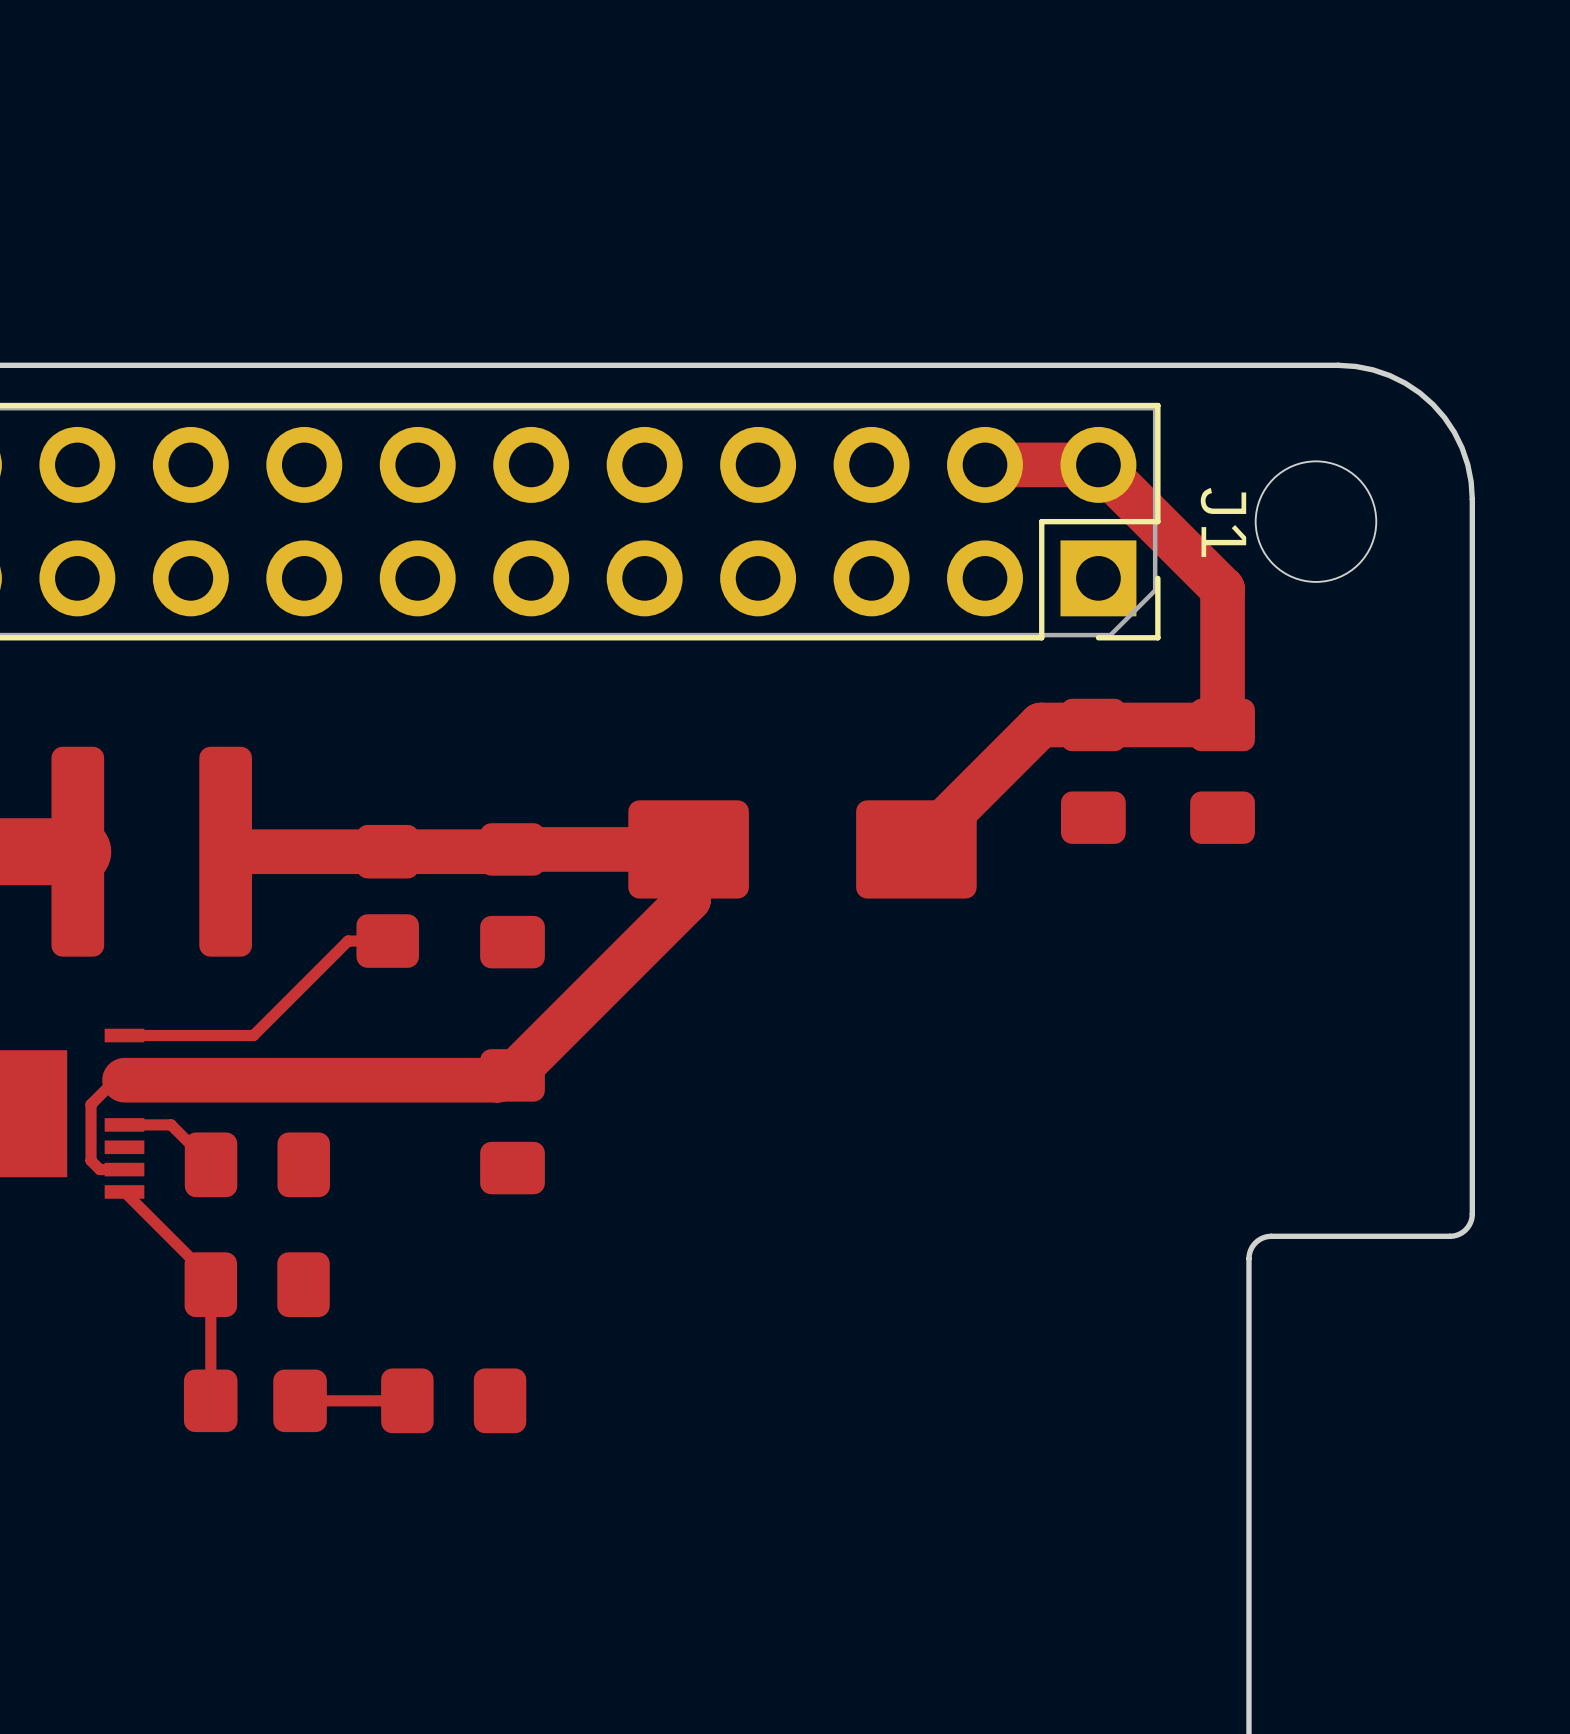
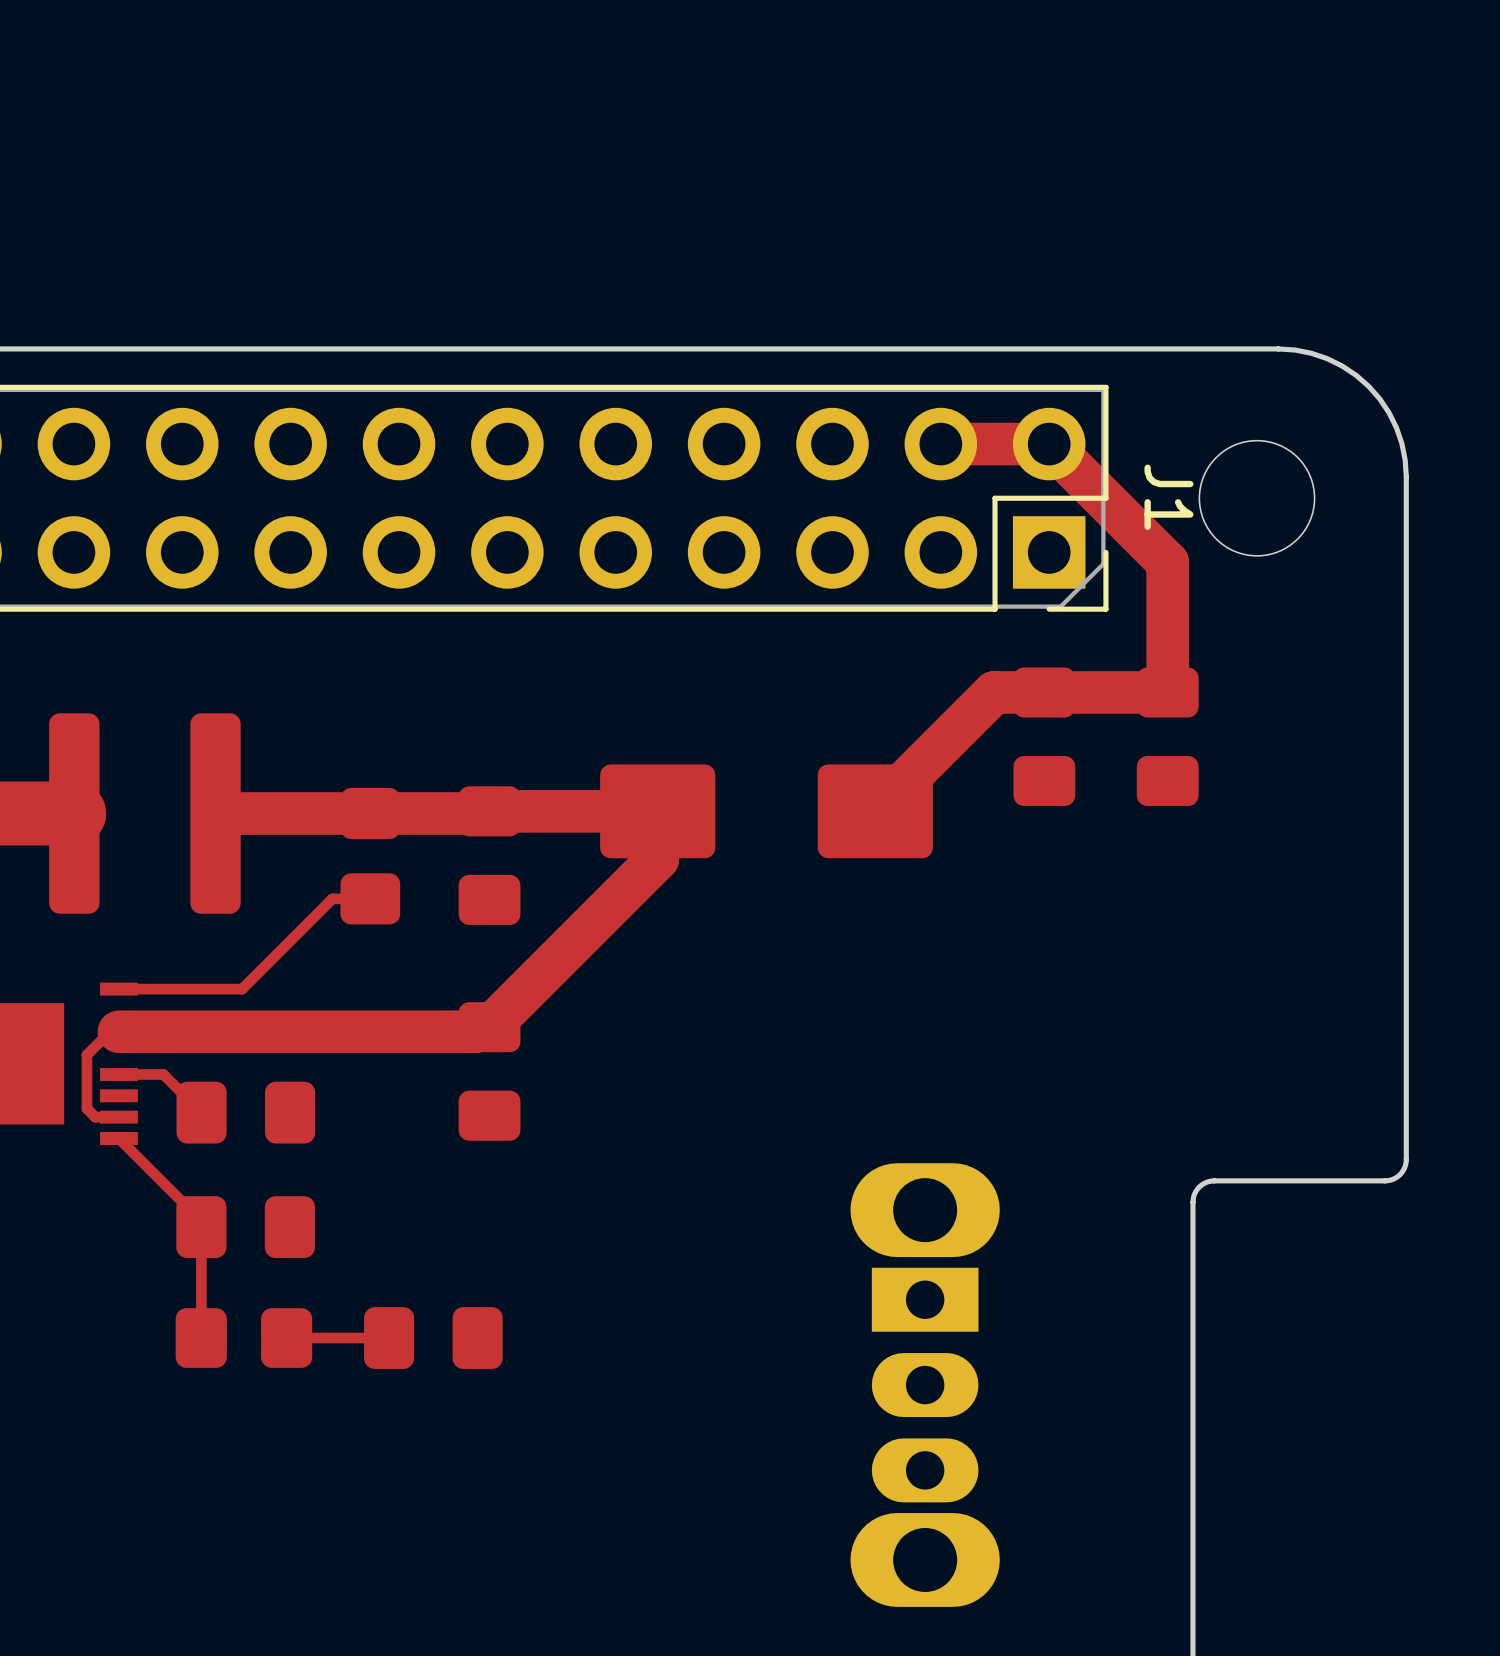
part: none -> (925, 1385)

